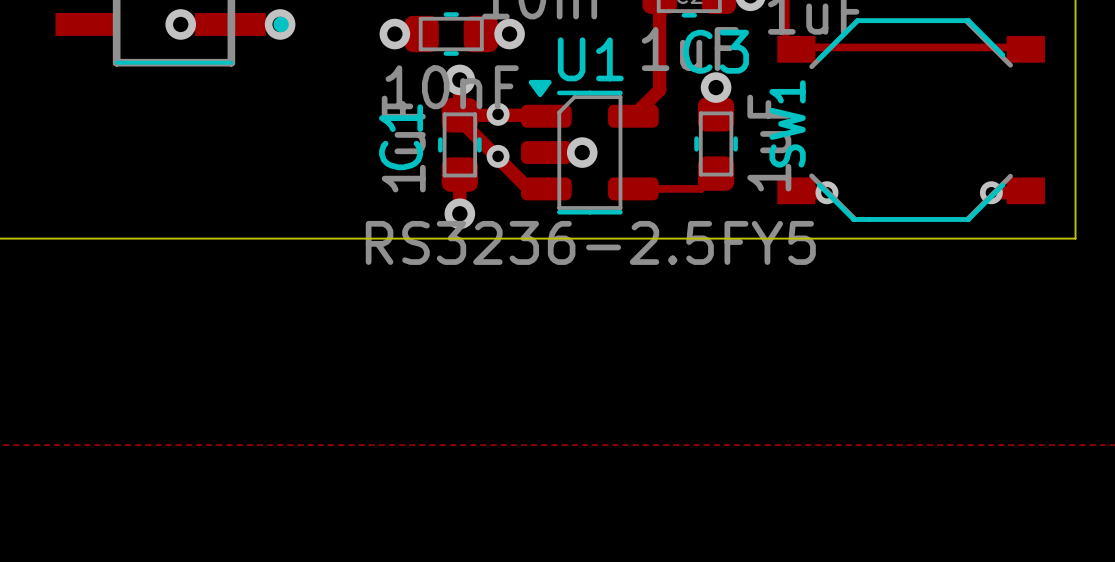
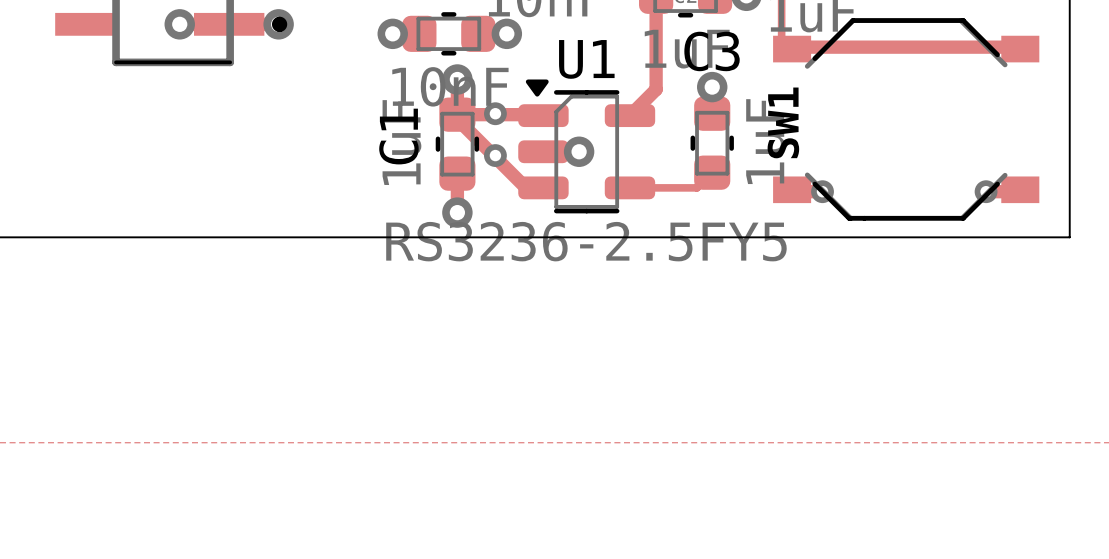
top track width: thin (792, 47) (1021, 47) -> thick (788, 47) (1016, 47)

